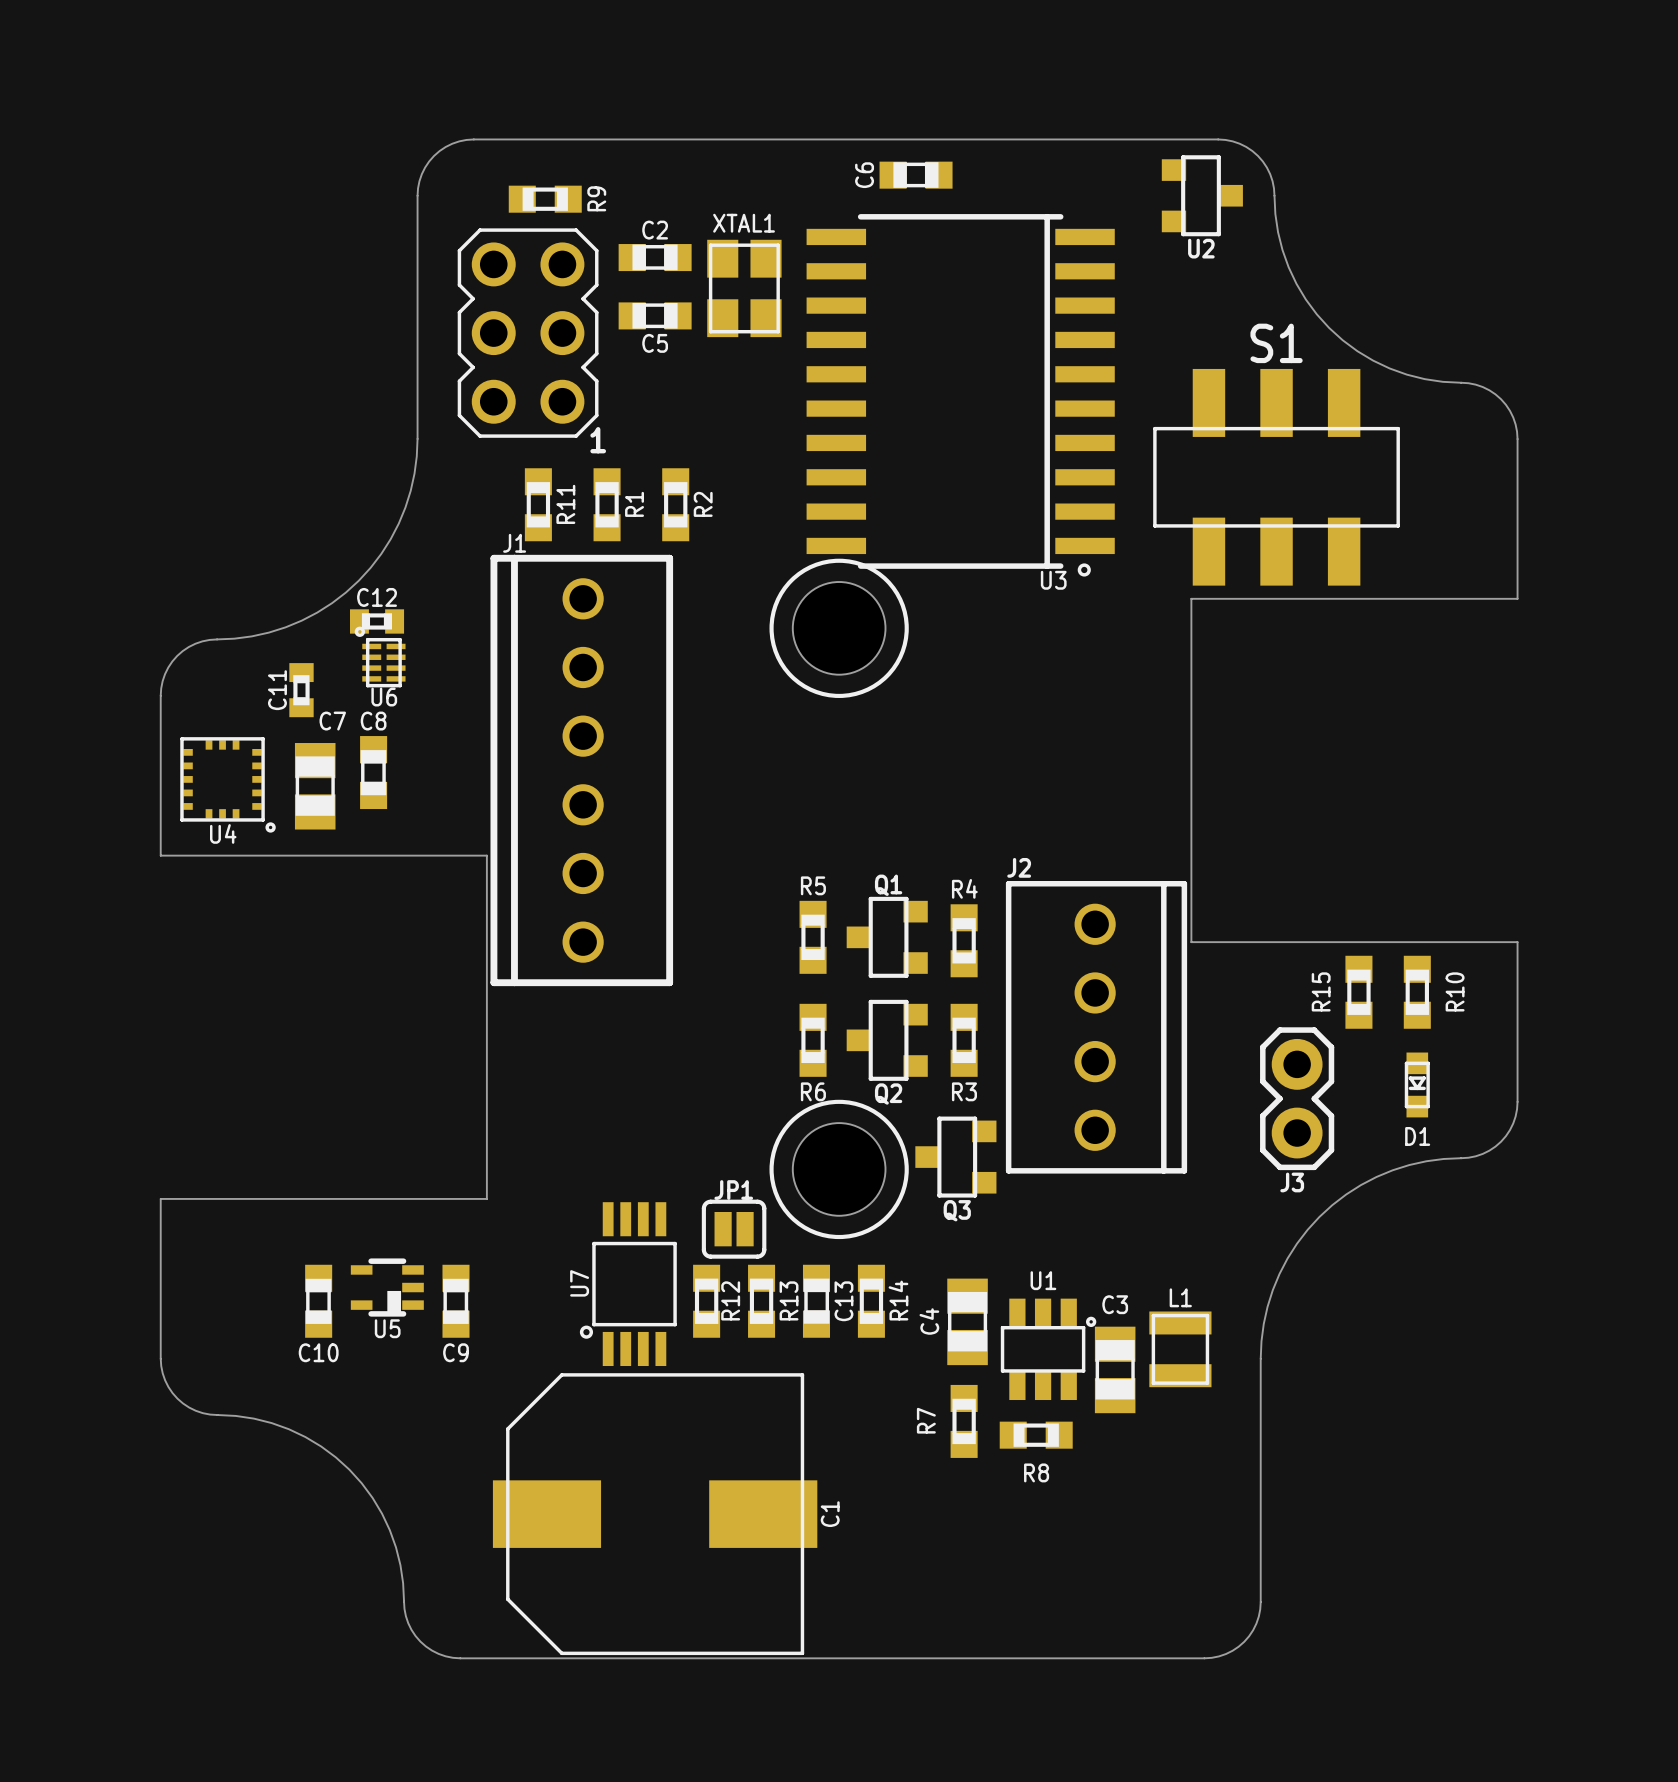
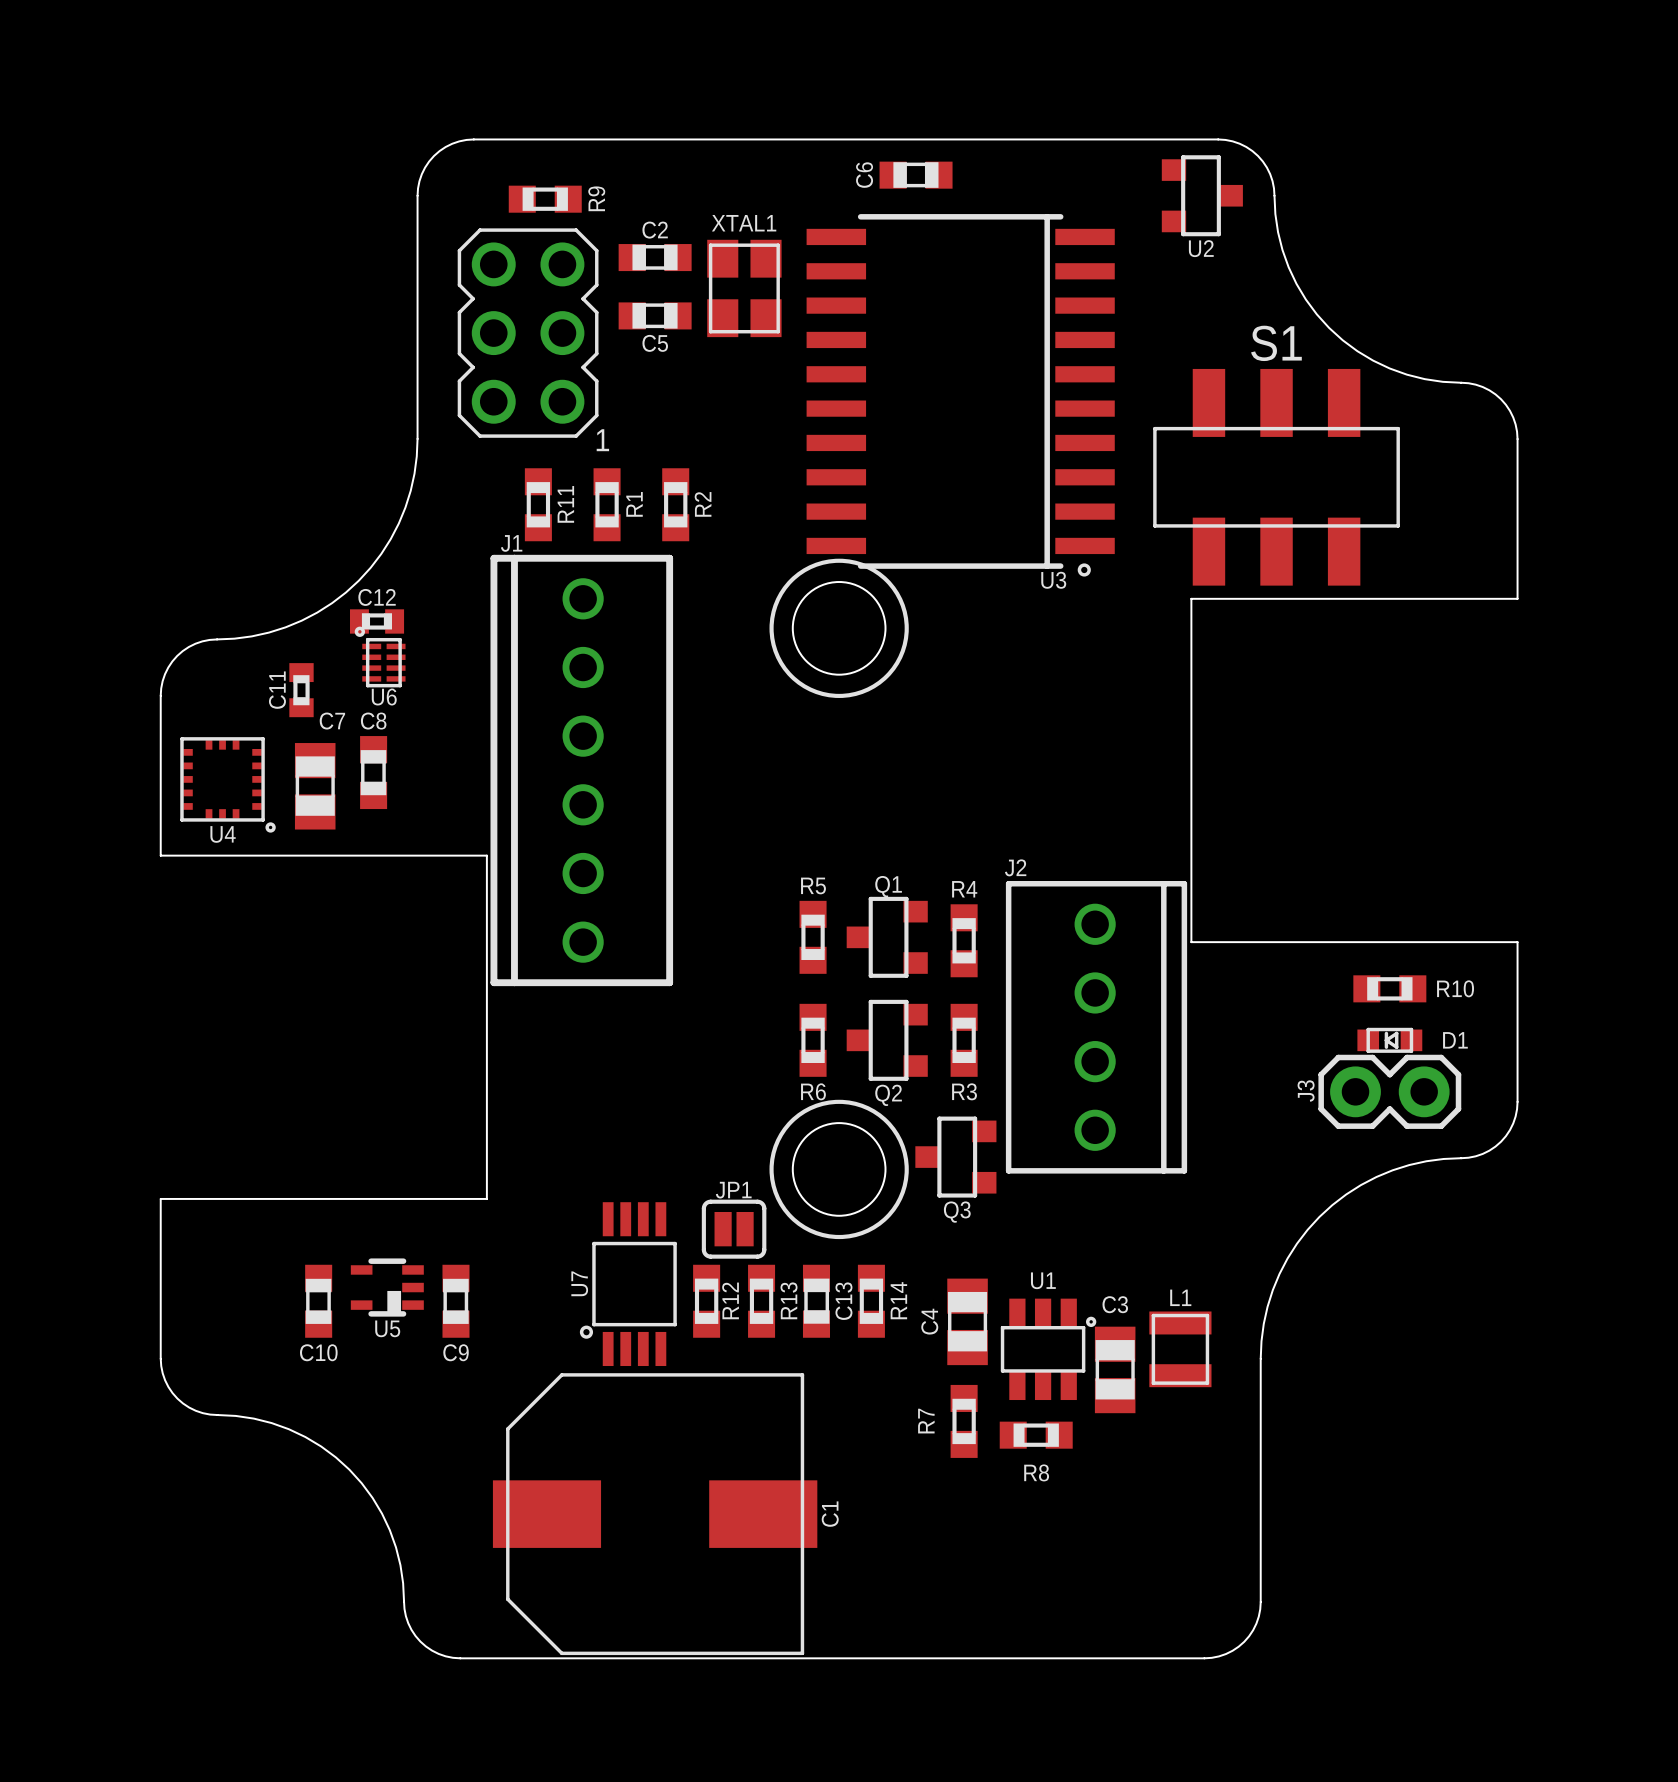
R15: (1358, 992) -> none
R10 rotation: 0° (1417, 992) -> 90° clockwise (1389, 988)
D1 rotation: 0° (1417, 1084) -> 90° clockwise (1389, 1040)
D1 position: (1417, 1084) -> (1389, 1040)
J3 rotation: 0° (1297, 1098) -> 90° clockwise (1389, 1091)
J3 position: (1297, 1098) -> (1389, 1091)
D1 name position: D1 (1417, 1136) -> D1 (1455, 1040)

